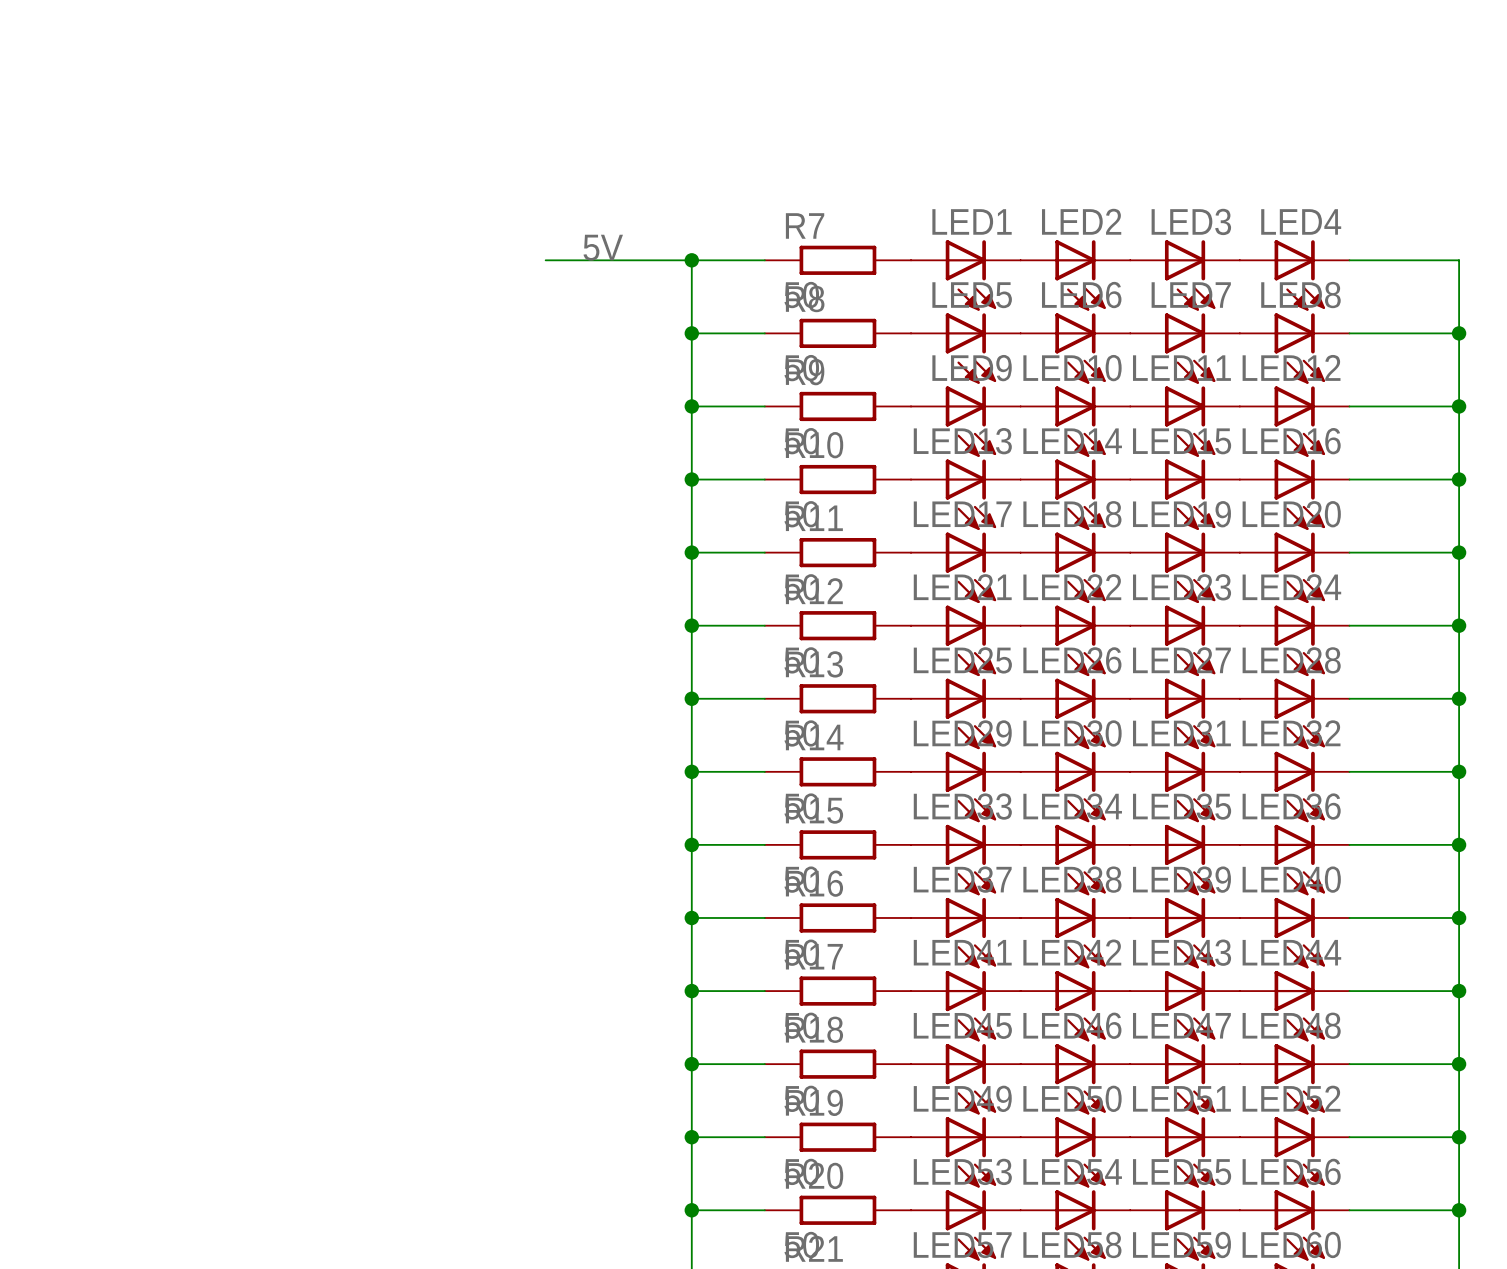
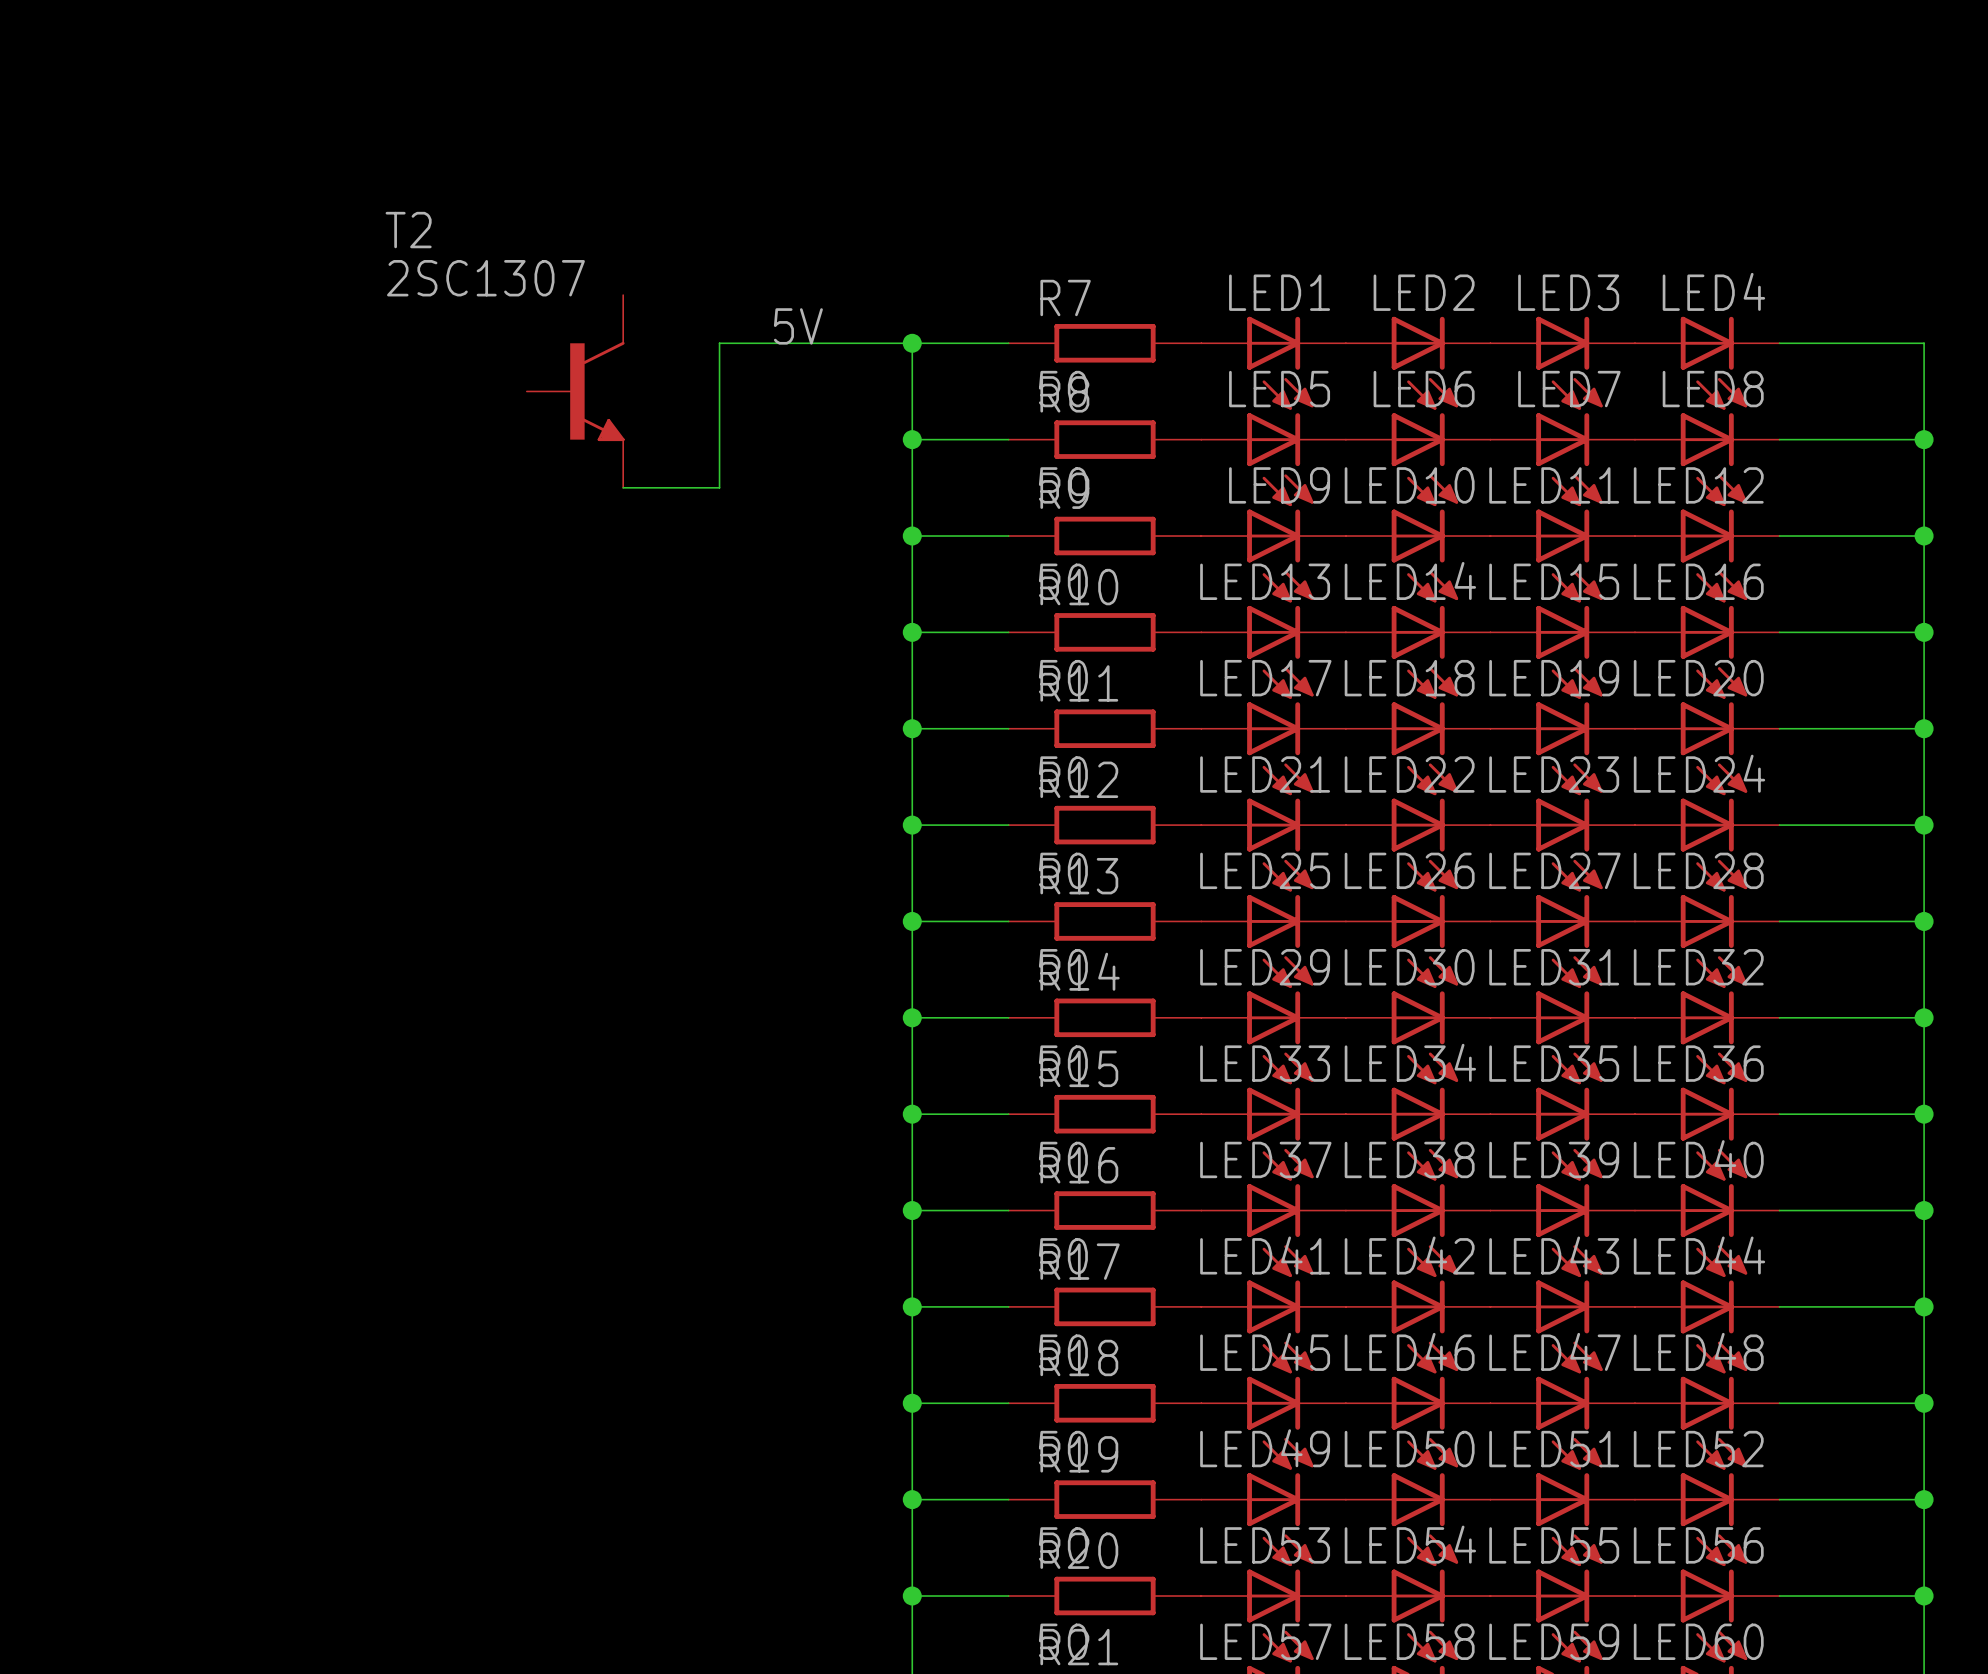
wire: none -> (719, 343) (719, 487) (623, 487)
T2: none -> 2SC1307 (575, 391)

